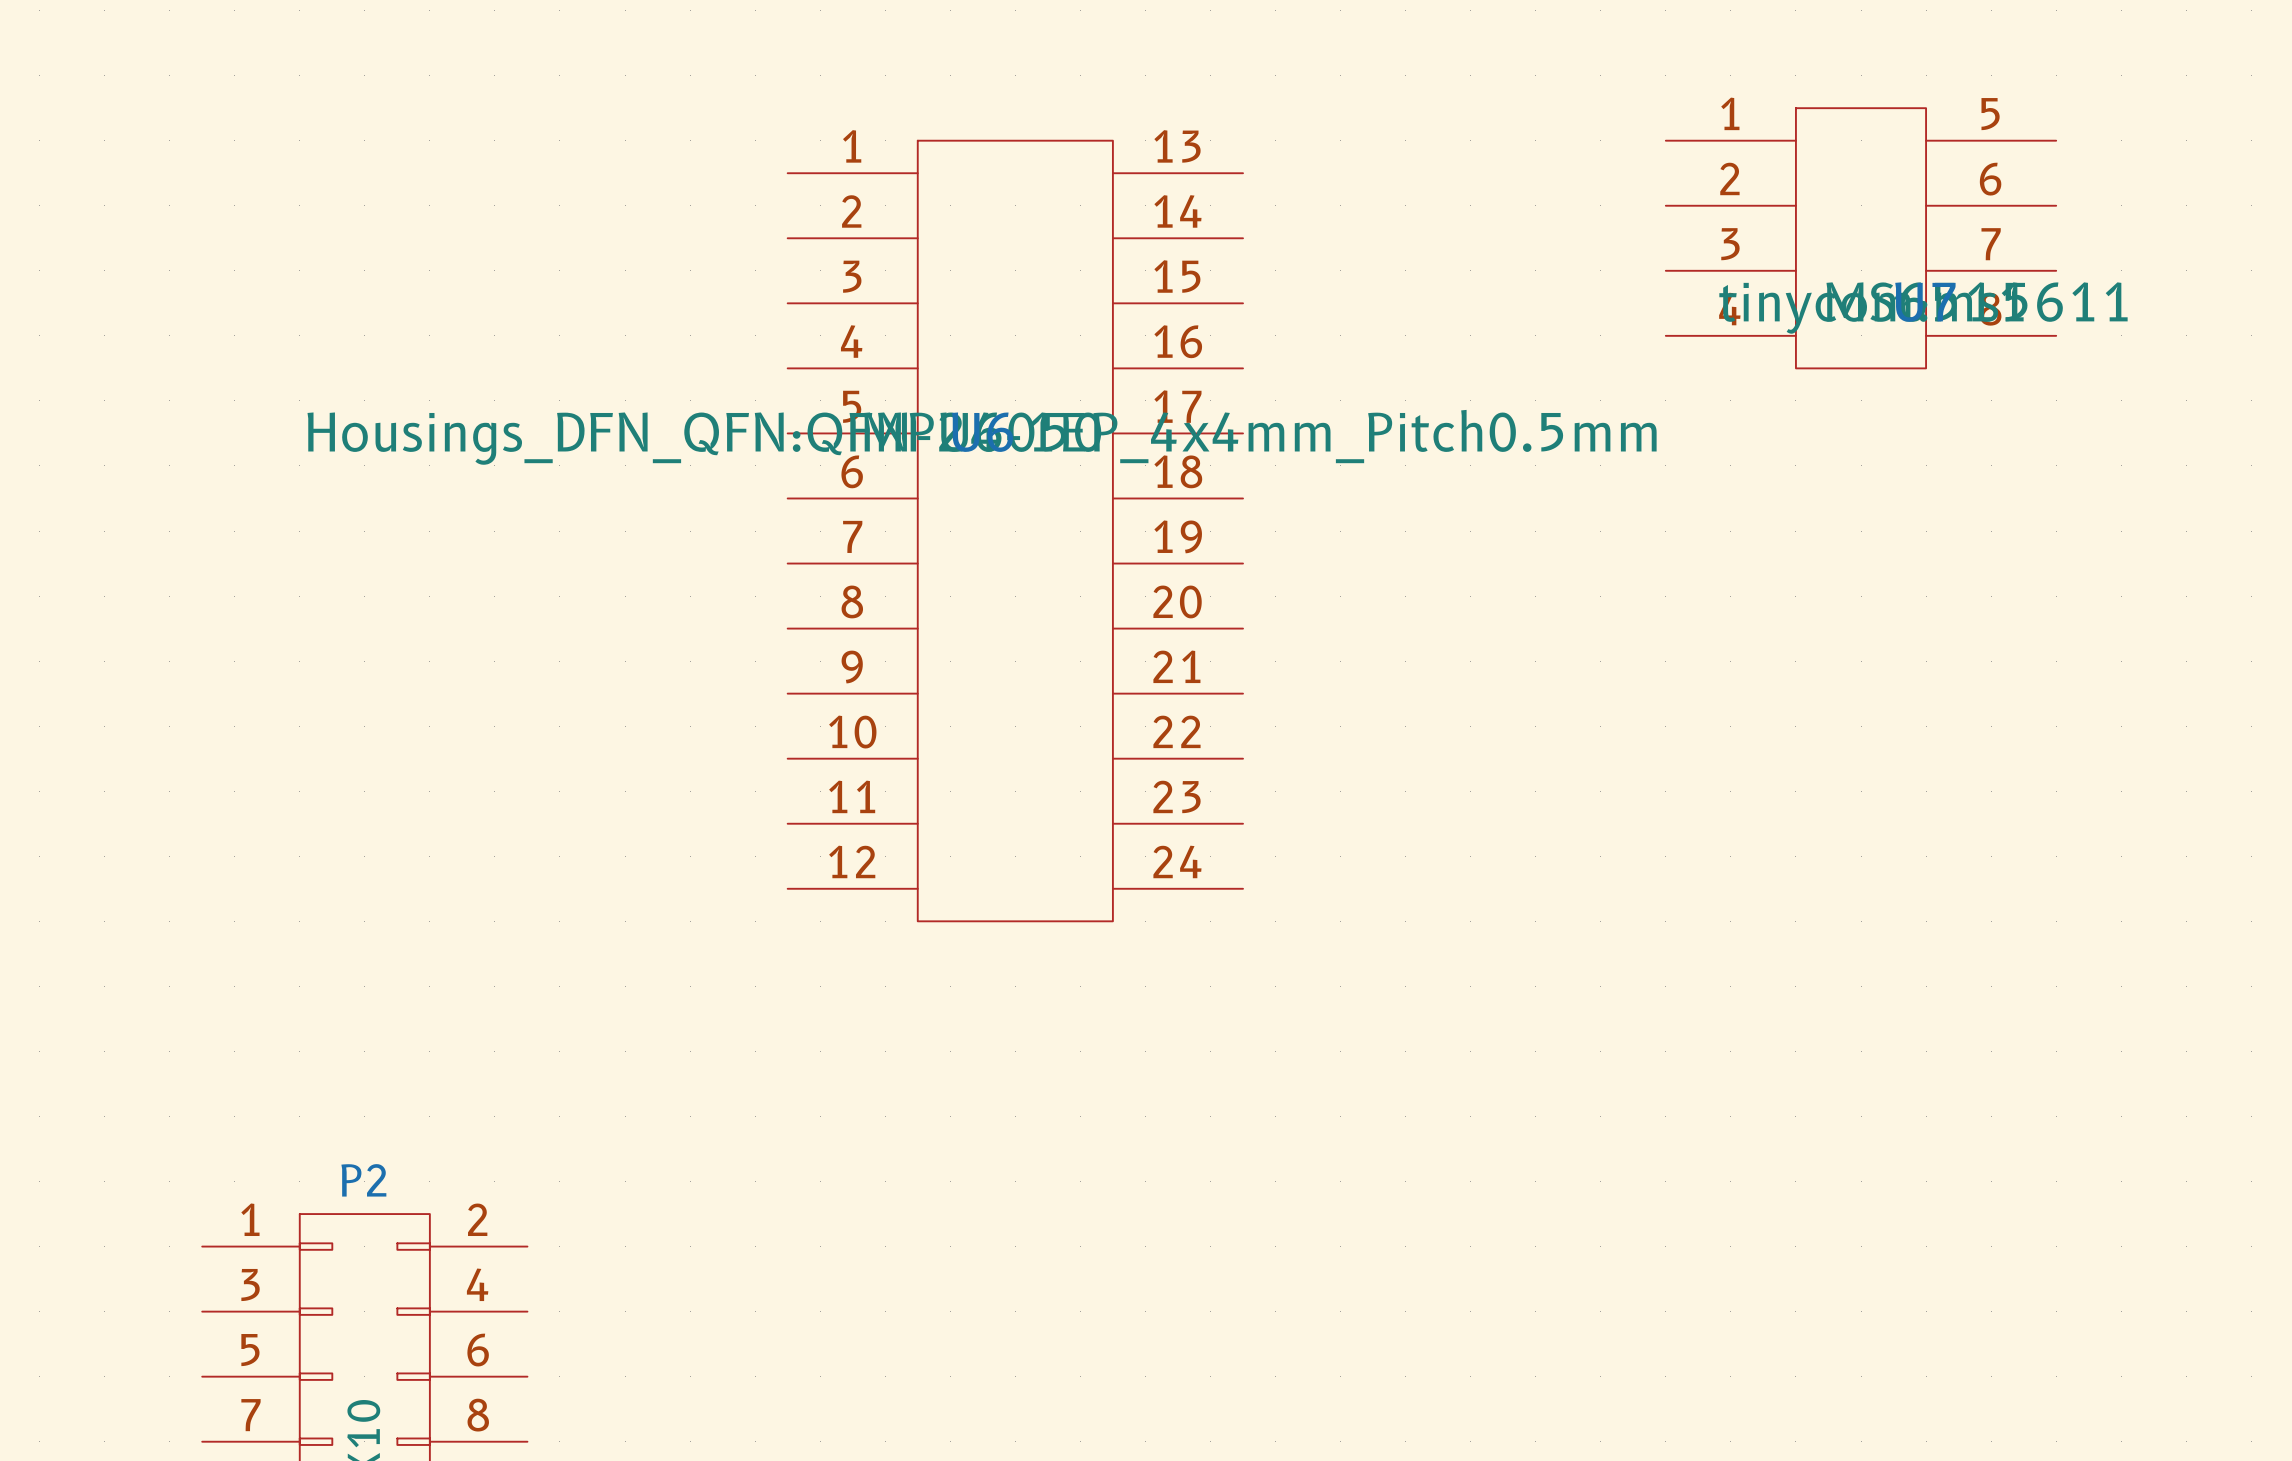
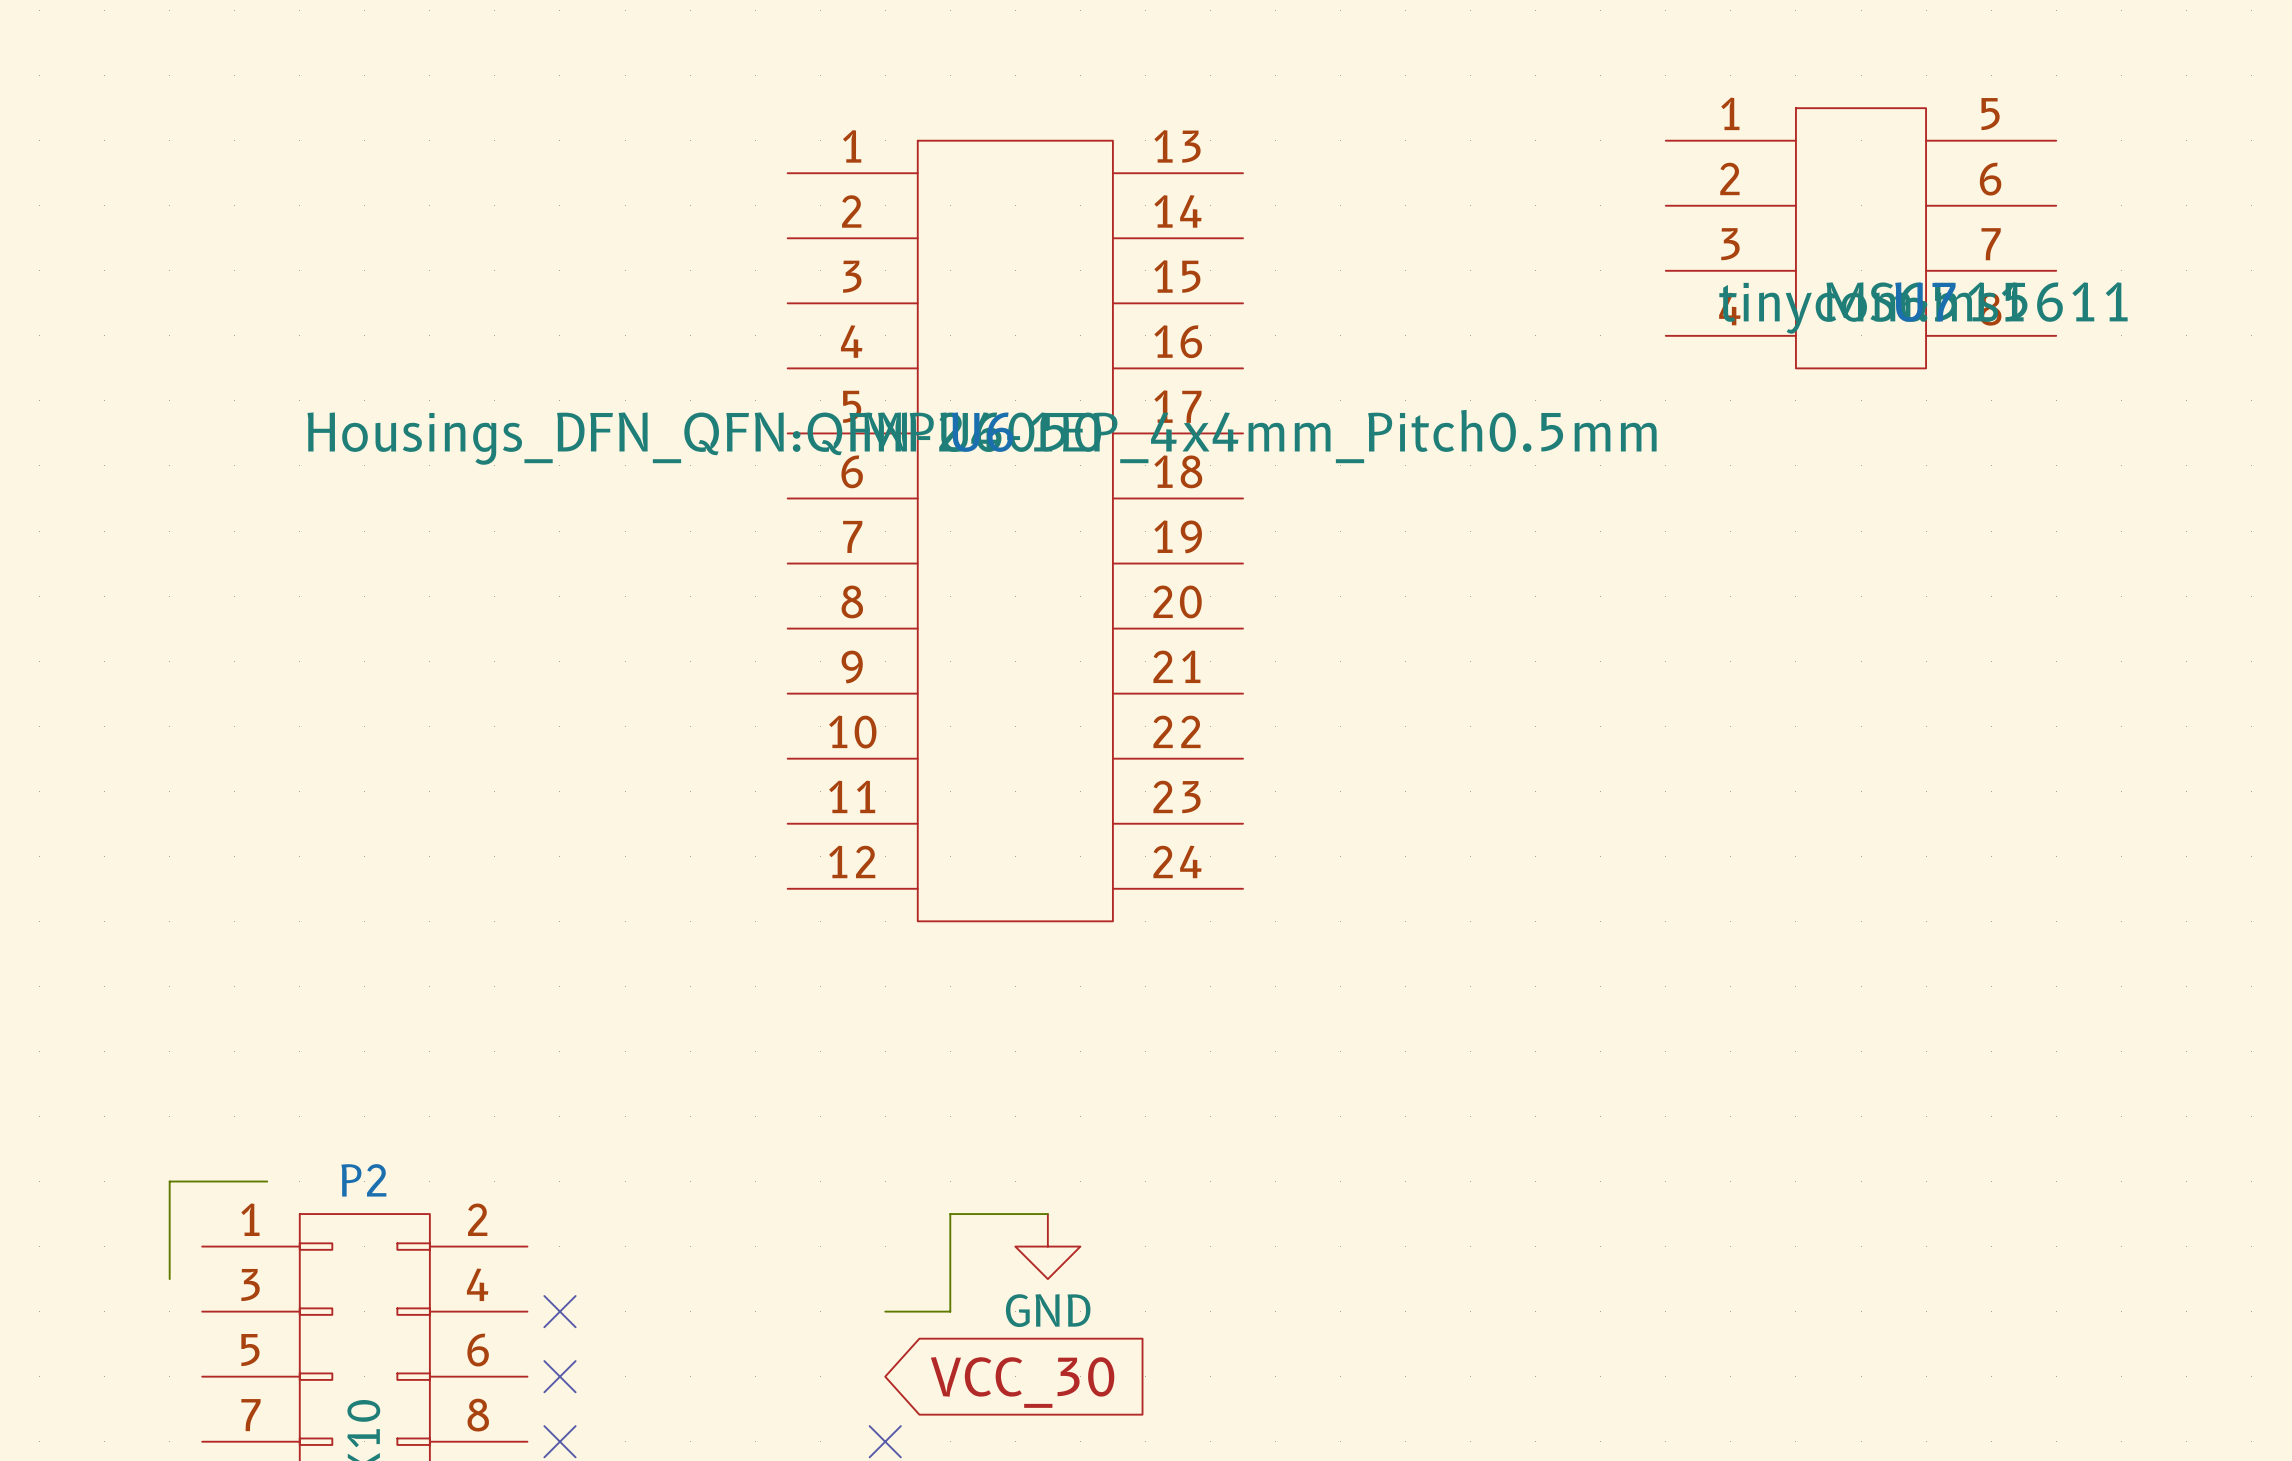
wire: none -> (267, 1181) (169, 1181) (169, 1279)
wire: none -> (1047, 1214) (950, 1214) (950, 1311) (885, 1311)
power symbol: none -> GND (1047, 1246)
no-connect mark: none -> (559, 1311)
no-connect mark: none -> (559, 1376)
global label: none -> VCC_30 (1022, 1382)
no-connect mark: none -> (559, 1441)
no-connect mark: none -> (885, 1441)

